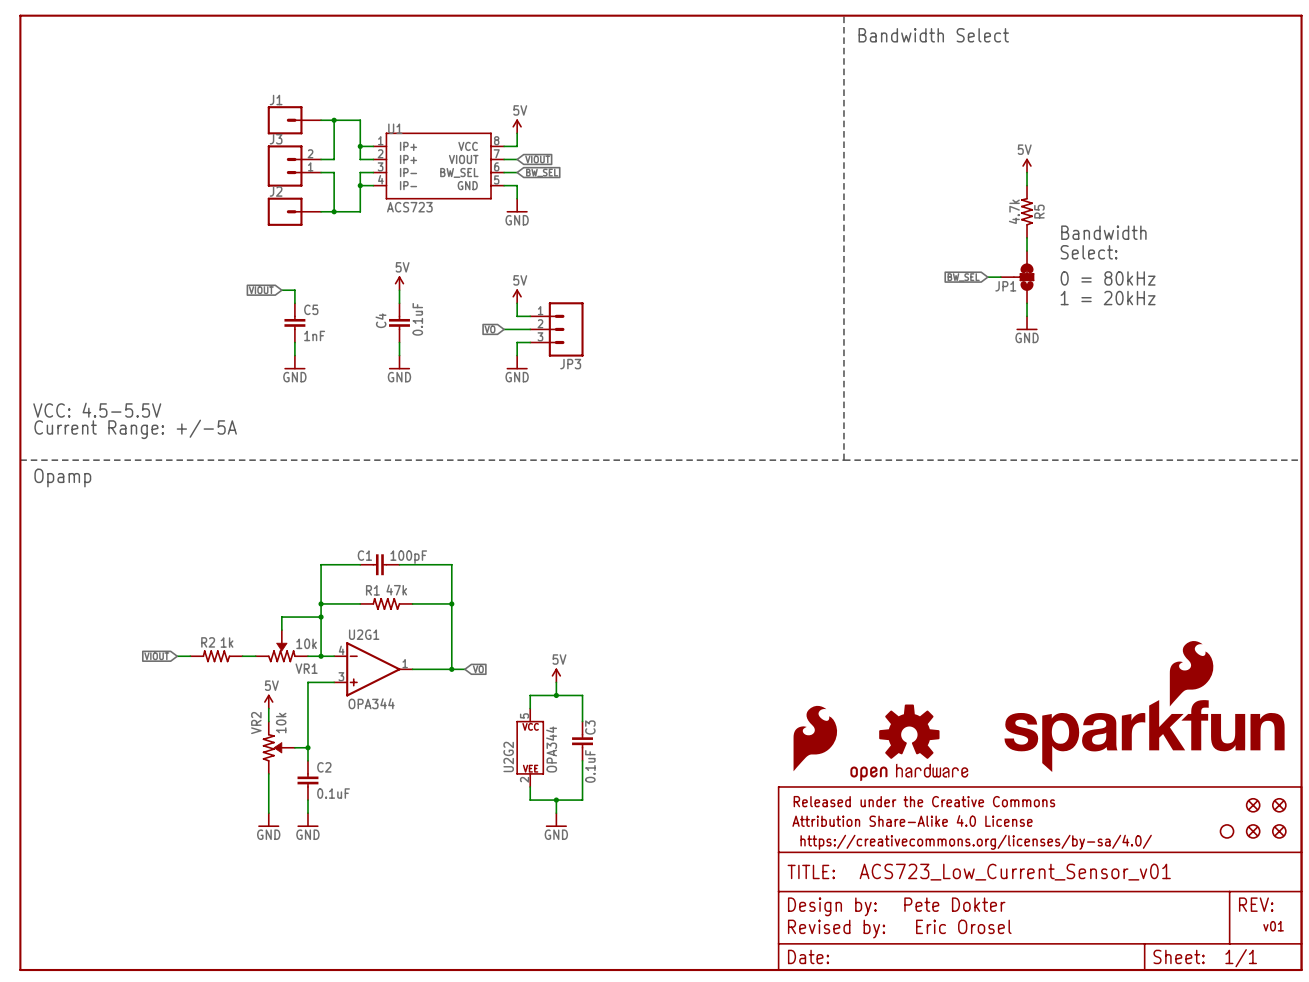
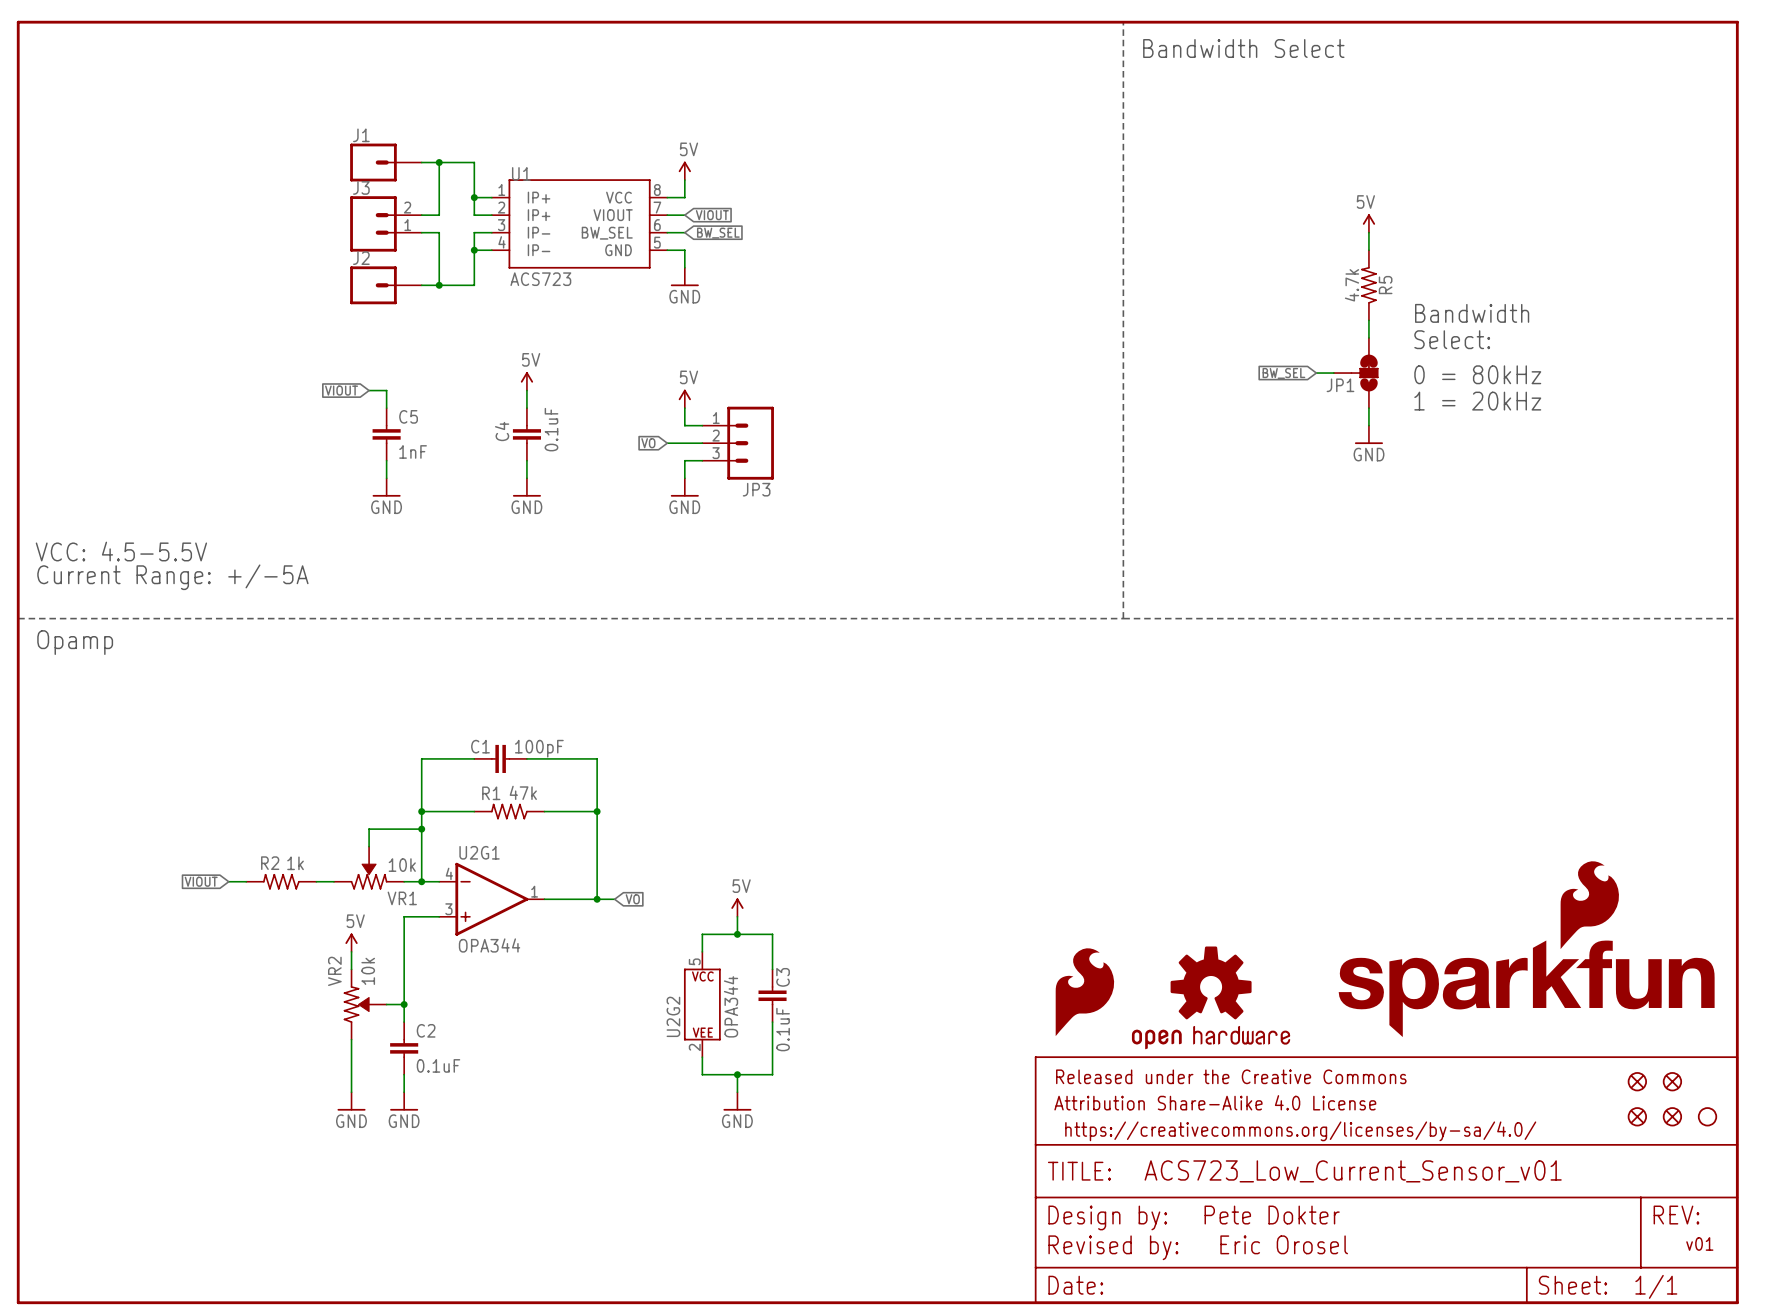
part position: (1279, 805) -> (1637, 1081)
part symbol: [1219, 824, 1235, 839] -> [1627, 1107, 1647, 1127]
part symbol: [1272, 824, 1287, 839] -> [1697, 1107, 1718, 1127]

